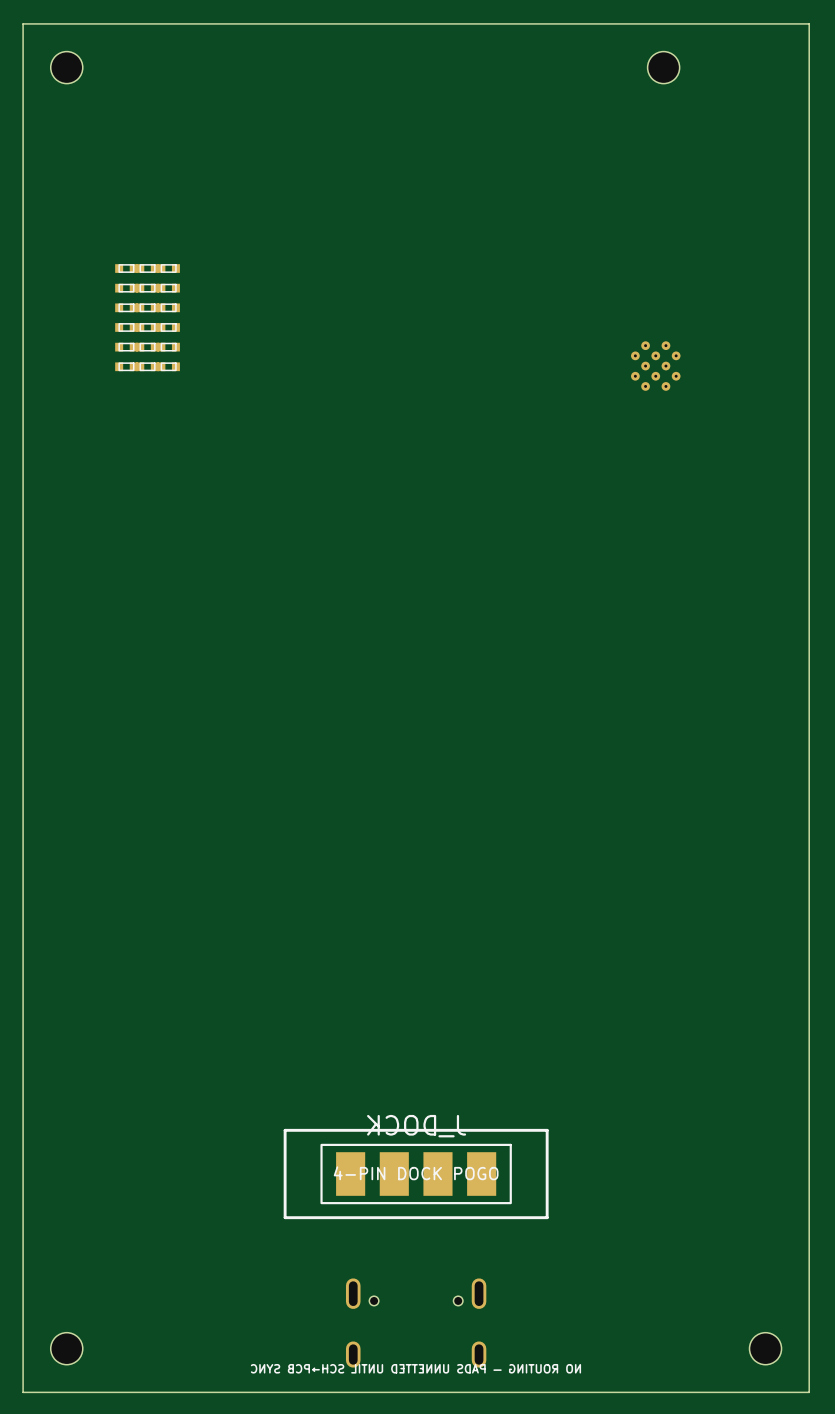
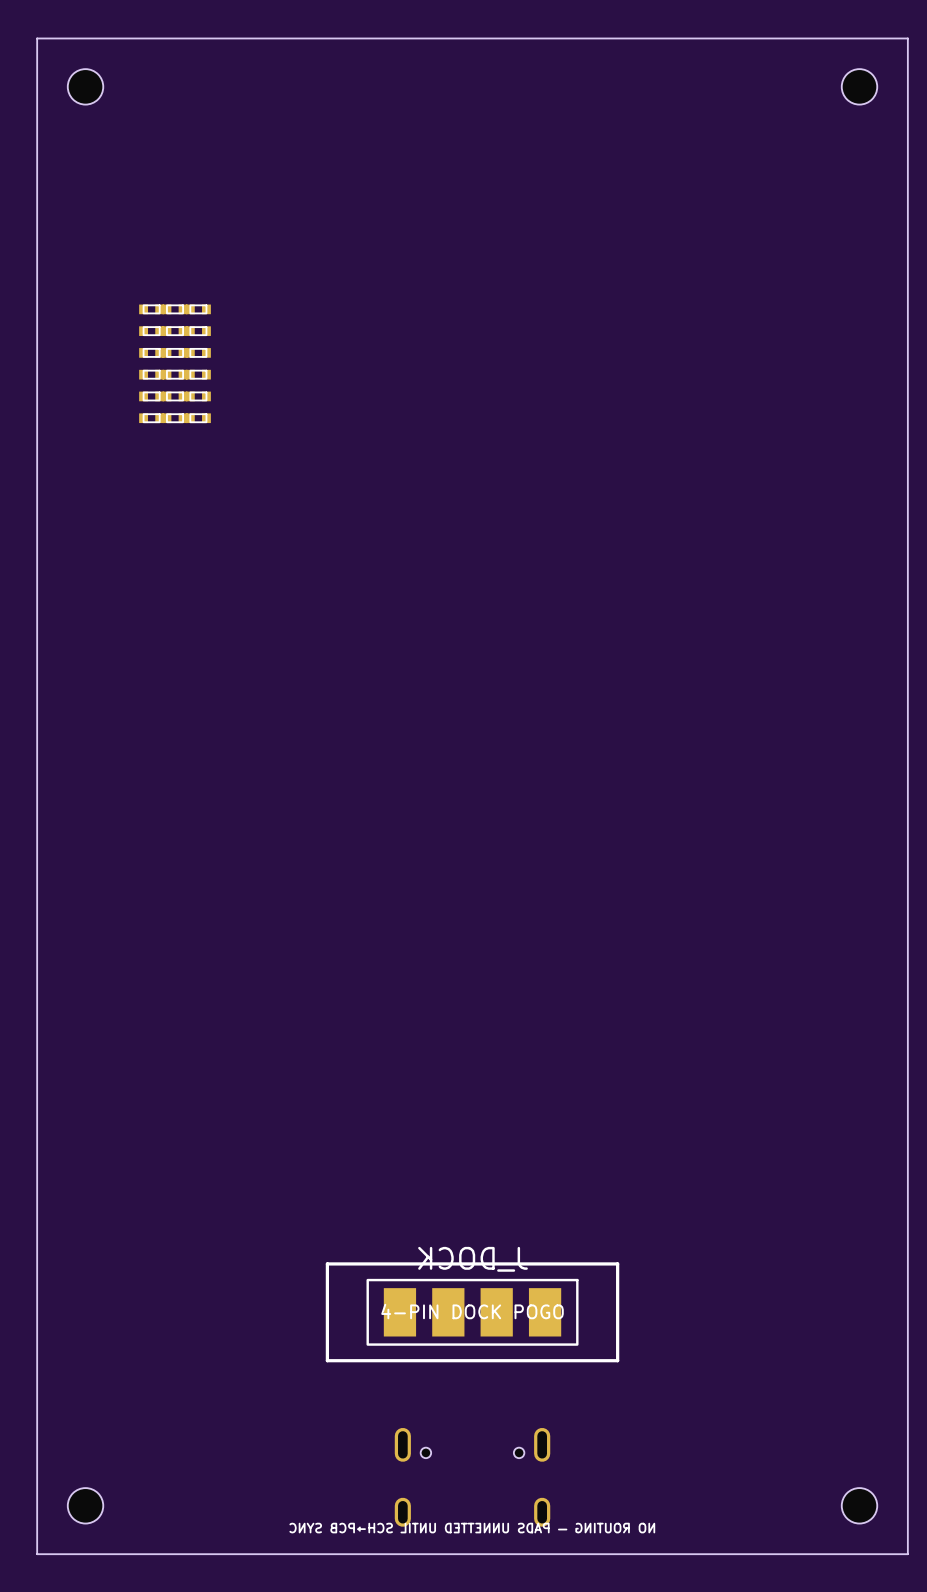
part position: (663, 67) -> (859, 86)
part: (655, 366) -> none

